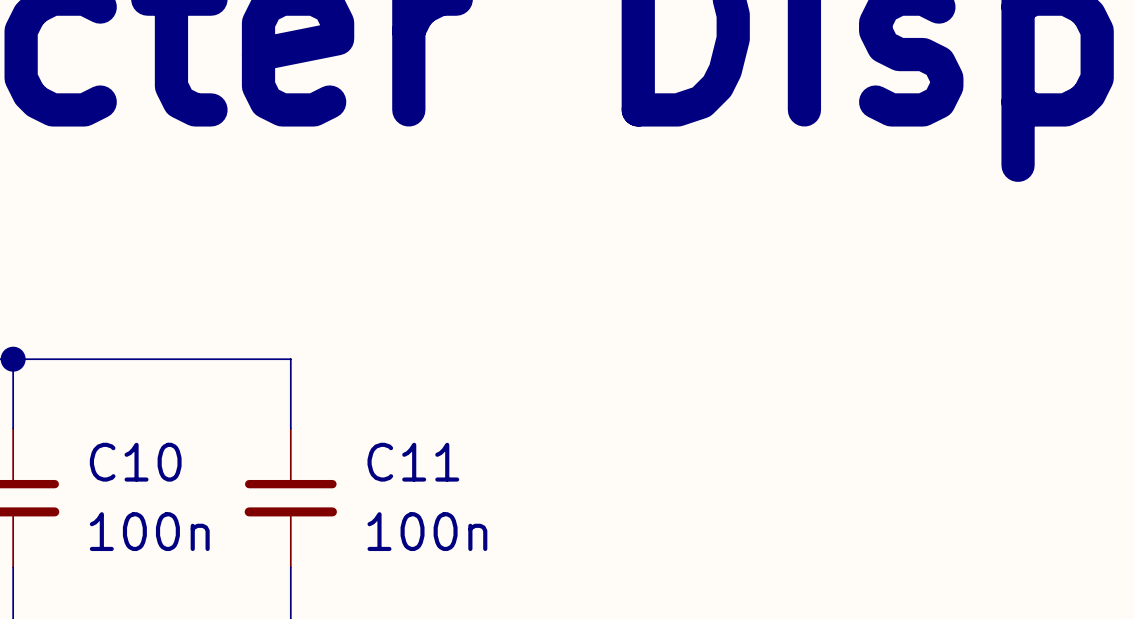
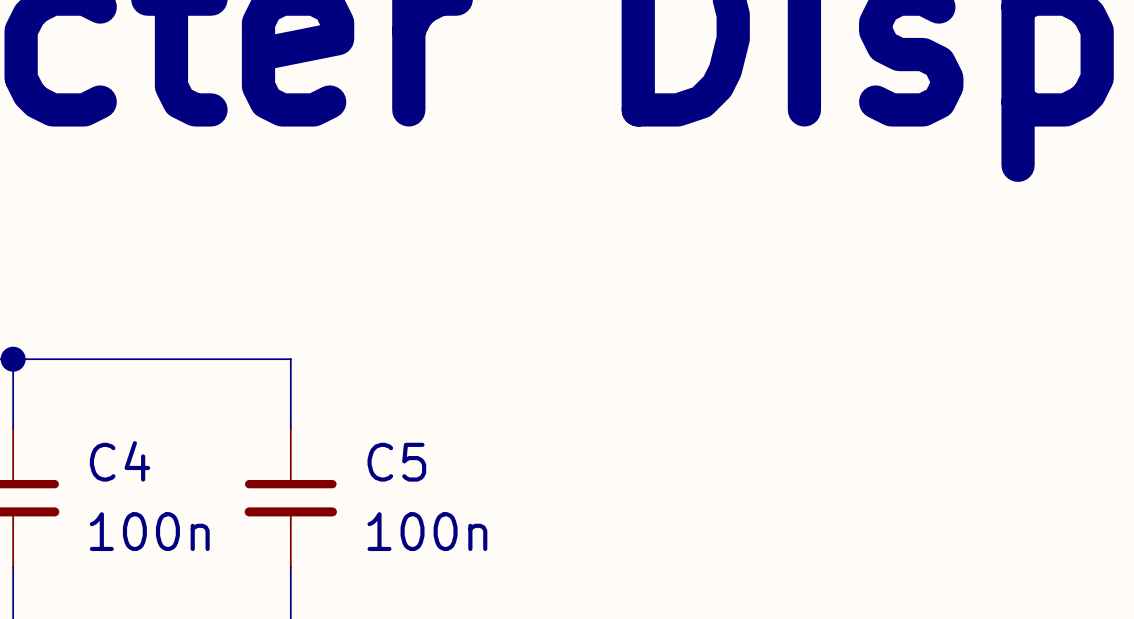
C10 name: C10 (135, 462) -> C4 (120, 461)
C11 name: C11 (413, 462) -> C5 (396, 462)

